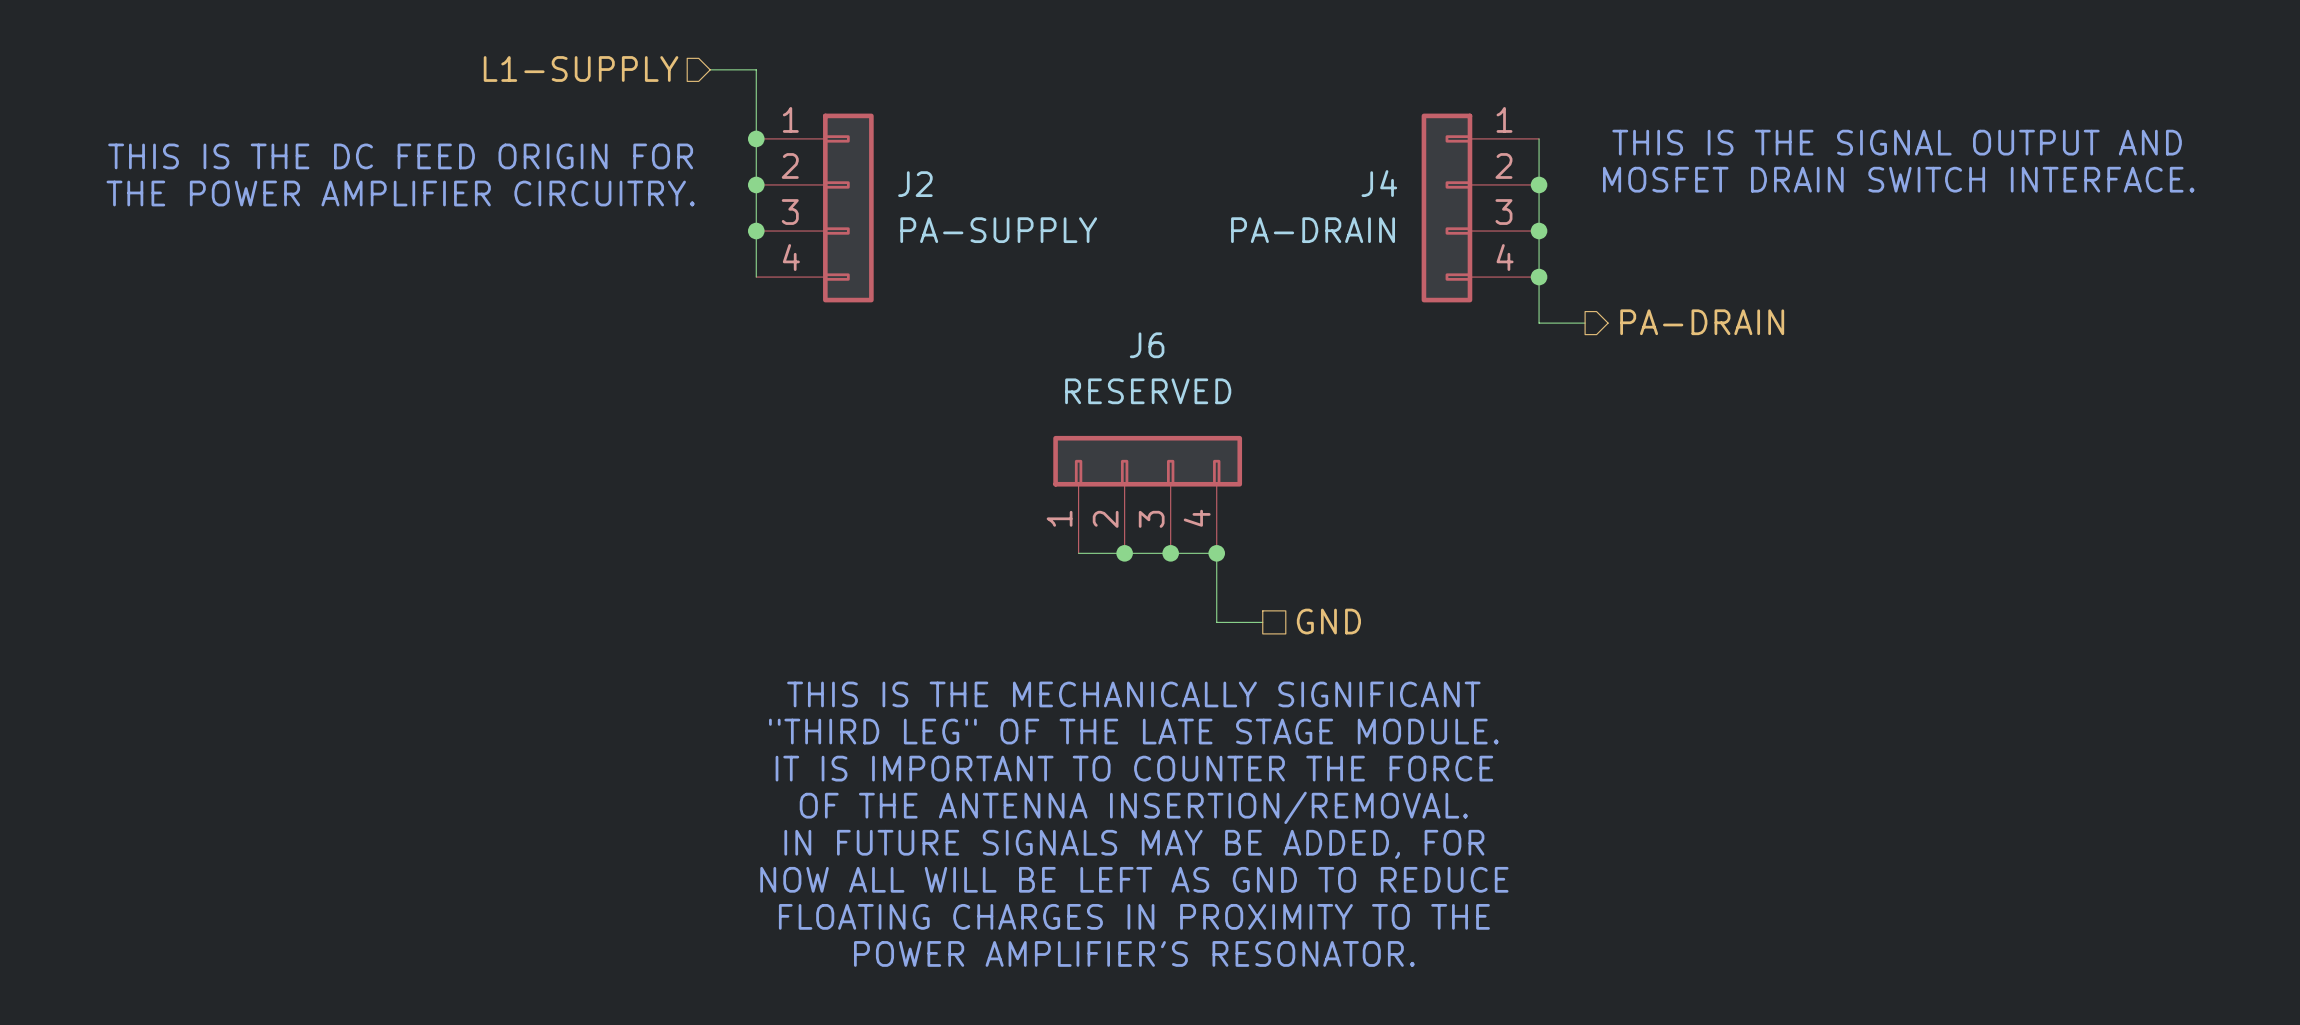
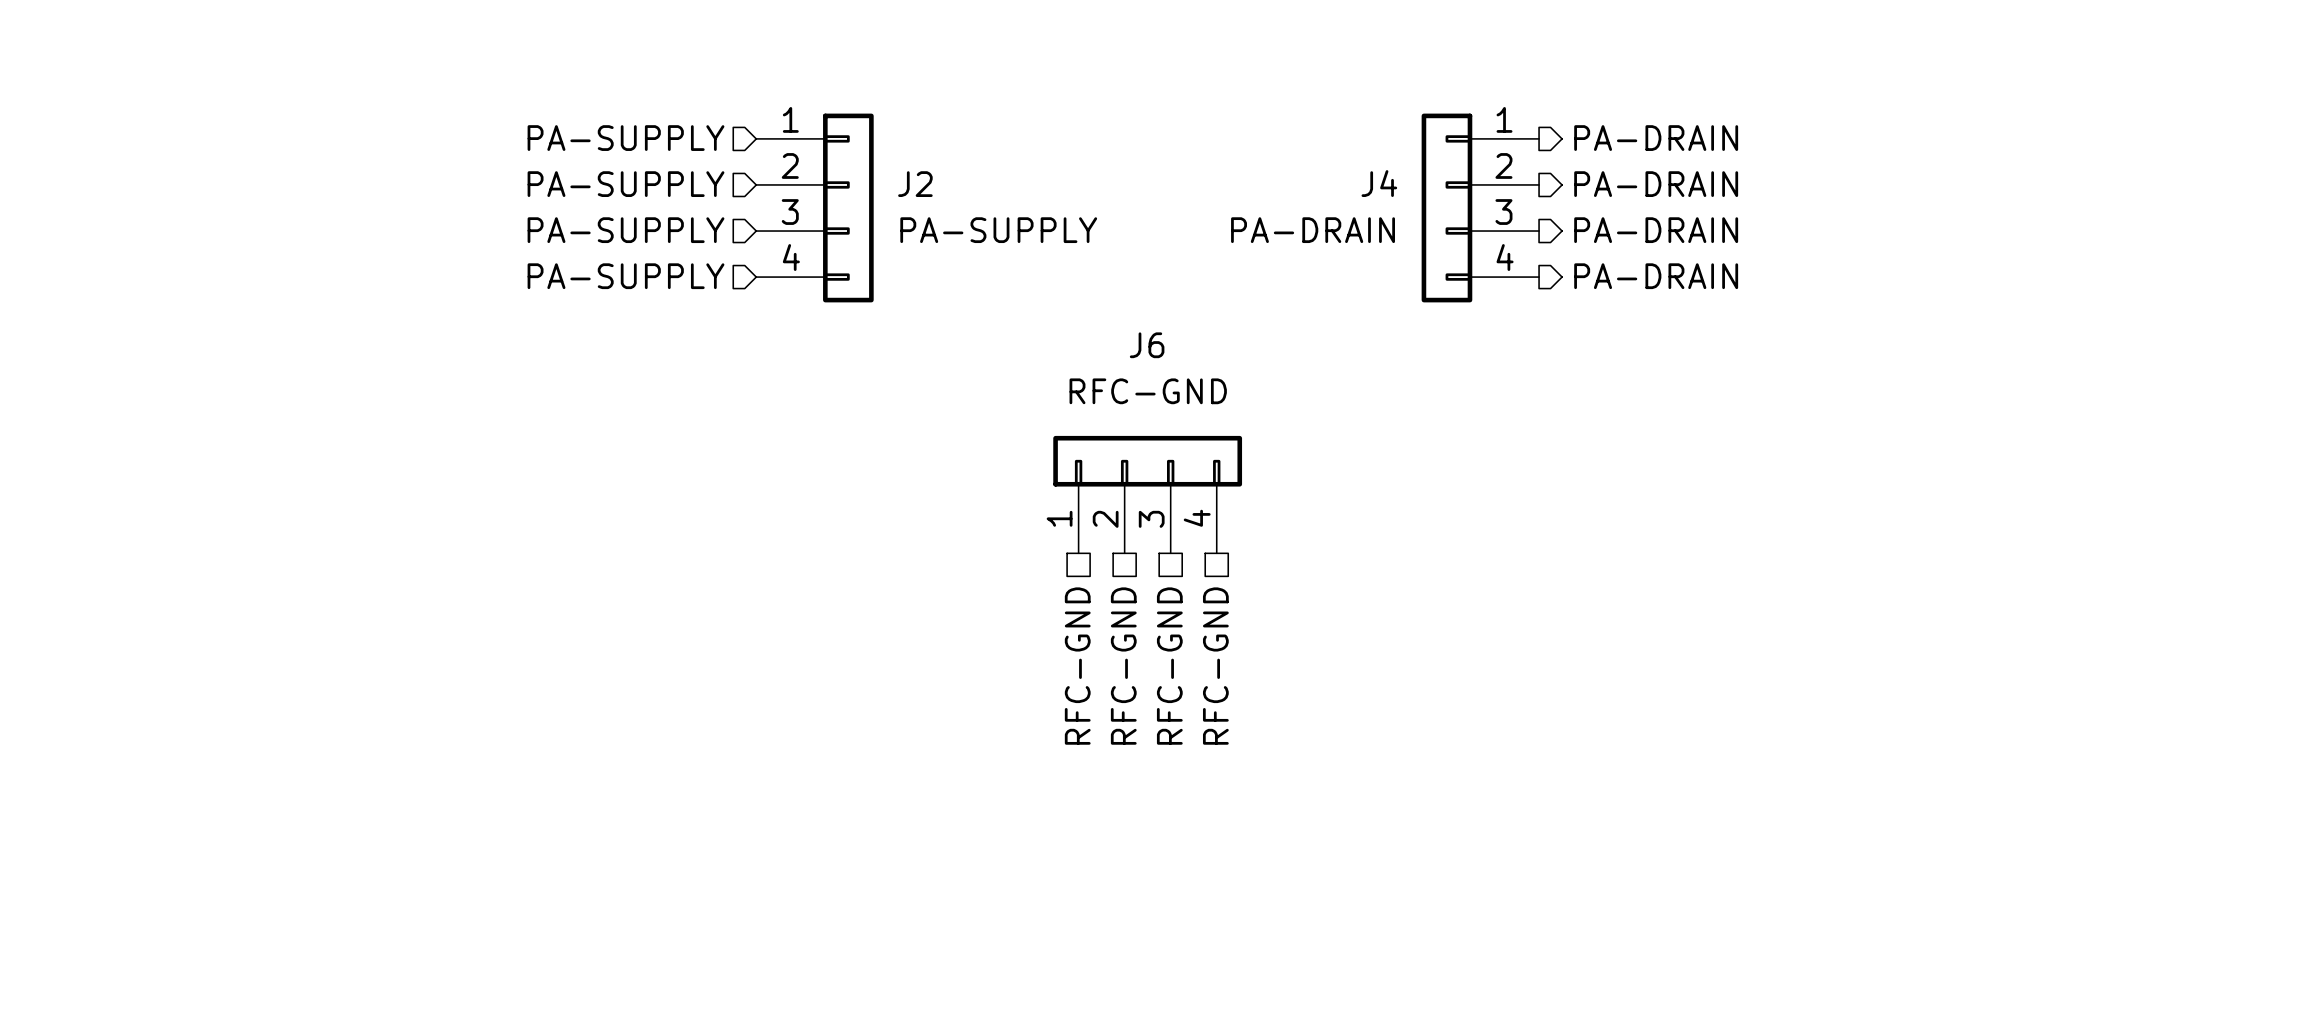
hierarchical label: L1-SUPPLY (581, 68) -> none
wire: (710, 69) (756, 69) (756, 277) -> none
hierarchical label: none -> PA-SUPPLY (626, 138)
junction: (756, 138) -> none
wire: (1539, 138) (1539, 323) (1585, 323) -> none
hierarchical label: none -> PA-DRAIN (1656, 138)
text: THIS IS THE SIGNAL OUTPUT AND (1897, 142) -> none
text: THIS IS THE DC FEED ORIGIN FOR (400, 156) -> none
text: MOSFET DRAIN SWITCH INTERFACE. (1898, 179) -> none
hierarchical label: none -> PA-SUPPLY (626, 184)
junction: (756, 184) -> none
junction: (1539, 184) -> none
hierarchical label: none -> PA-DRAIN (1656, 184)
text: THE POWER AMPLIFIER CIRCUITRY. (400, 193) -> none
hierarchical label: none -> PA-SUPPLY (626, 230)
hierarchical label: none -> PA-DRAIN (1656, 230)
junction: (756, 231) -> none
junction: (1539, 231) -> none
hierarchical label: none -> PA-SUPPLY (626, 276)
junction: (1539, 277) -> none
hierarchical label position: PA-DRAIN (1702, 322) -> PA-DRAIN (1656, 276)
J6 value: RESERVED (1148, 391) -> RFC-GND (1148, 391)
wire: (1078, 553) (1216, 553) (1216, 622) (1262, 622) -> none
junction: (1124, 553) -> none
junction: (1170, 553) -> none
junction: (1216, 553) -> none
hierarchical label: GND (1328, 621) -> none
hierarchical label: none -> RFC-GND (1077, 666)
hierarchical label: none -> RFC-GND (1123, 666)
hierarchical label: none -> RFC-GND (1169, 666)
hierarchical label: none -> RFC-GND (1215, 666)
text: THIS IS THE MECHANICALLY SIGNIFICANT (1133, 694) -> none
text: "THIRD LEG" OF THE LATE STAGE MODULE. (1133, 731) -> none
text: IT IS IMPORTANT TO COUNTER THE FORCE (1134, 768) -> none
text: OF THE ANTENNA INSERTION/REMOVAL. (1133, 807) -> none
text: IN FUTURE SIGNALS MAY BE ADDED, FOR (1134, 844) -> none
text: NOW ALL WILL BE LEFT AS GND TO REDUCE (1134, 879) -> none
text: FLOATING CHARGES IN PROXIMITY TO THE (1134, 916) -> none
text: POWER AMPLIFIER'S RESONATOR. (1134, 953) -> none

